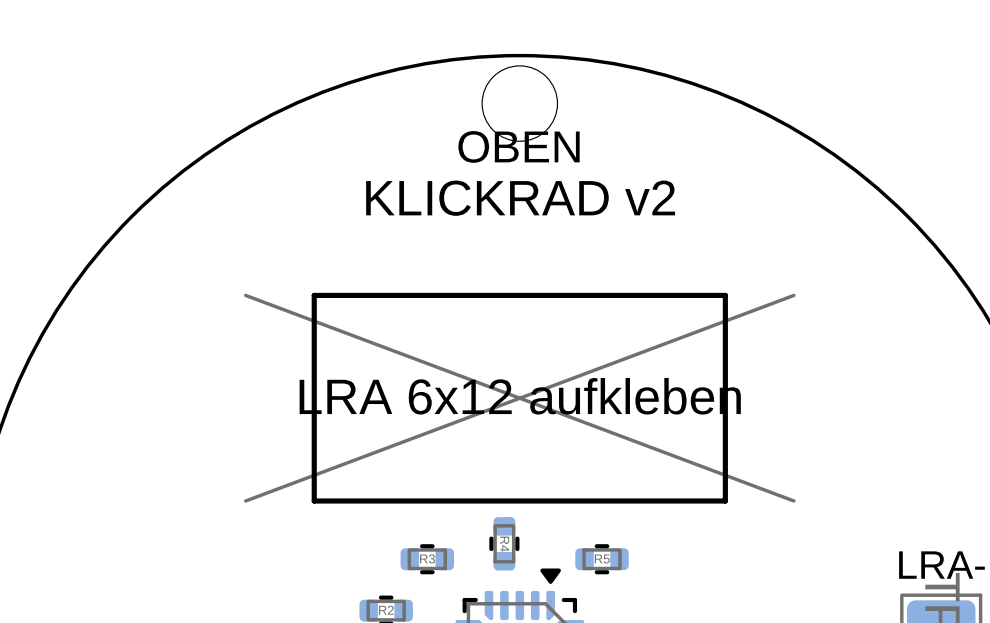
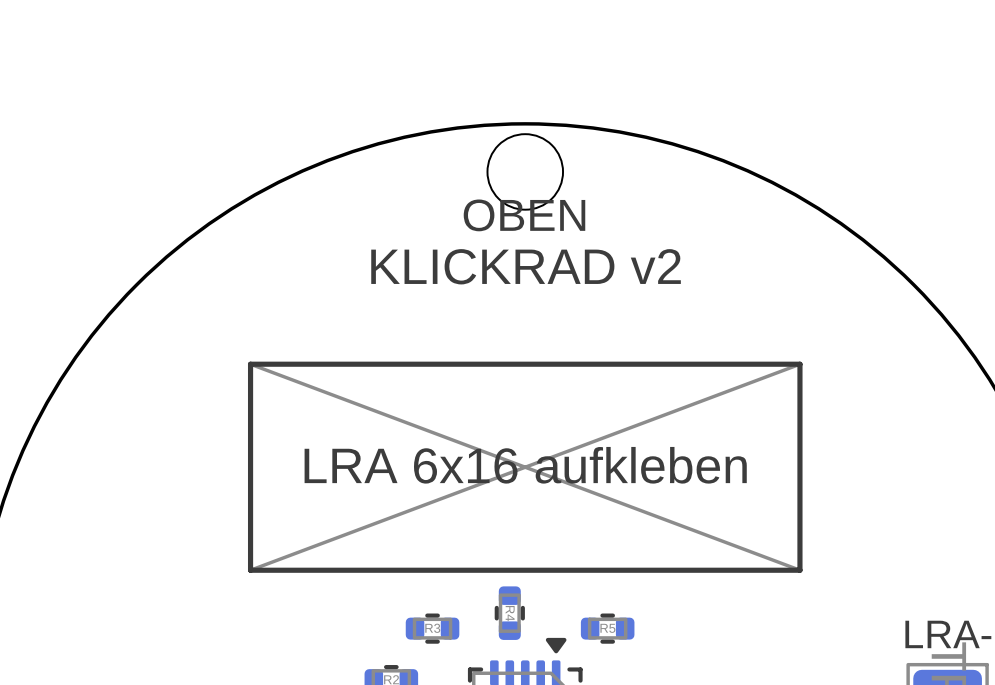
line: (314, 295) (314, 500) -> (319, 364) (250, 364) (250, 570) (319, 570)
line: (725, 295) (725, 500) -> (731, 364) (799, 364) (799, 570) (731, 570)
text: LRA 6x12 aufkleben (520, 396) -> LRA 6x16 aufkleben (525, 465)

